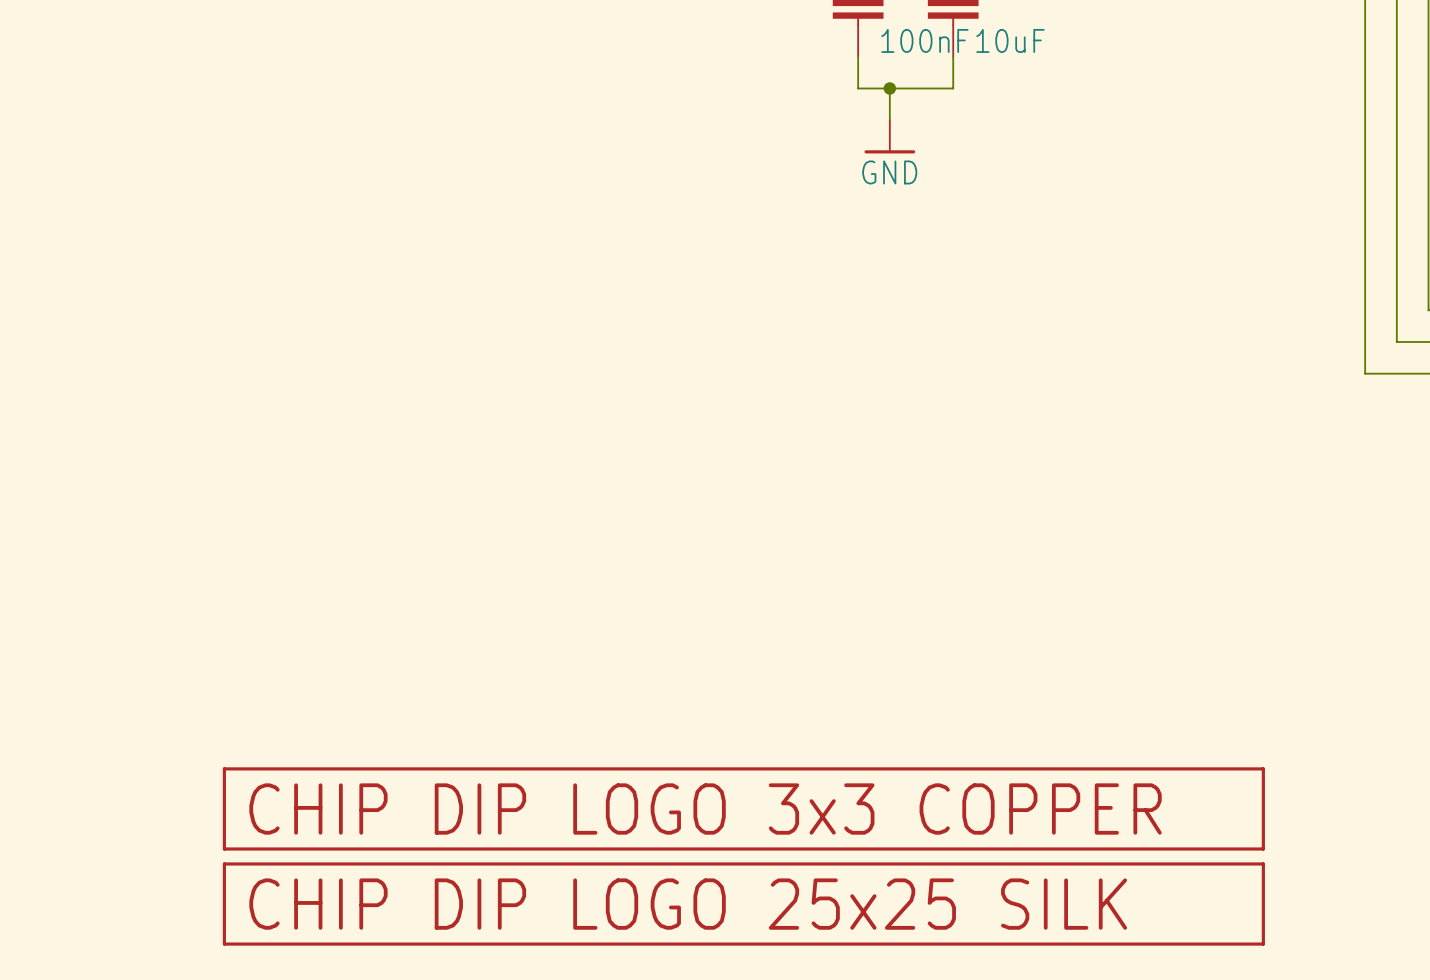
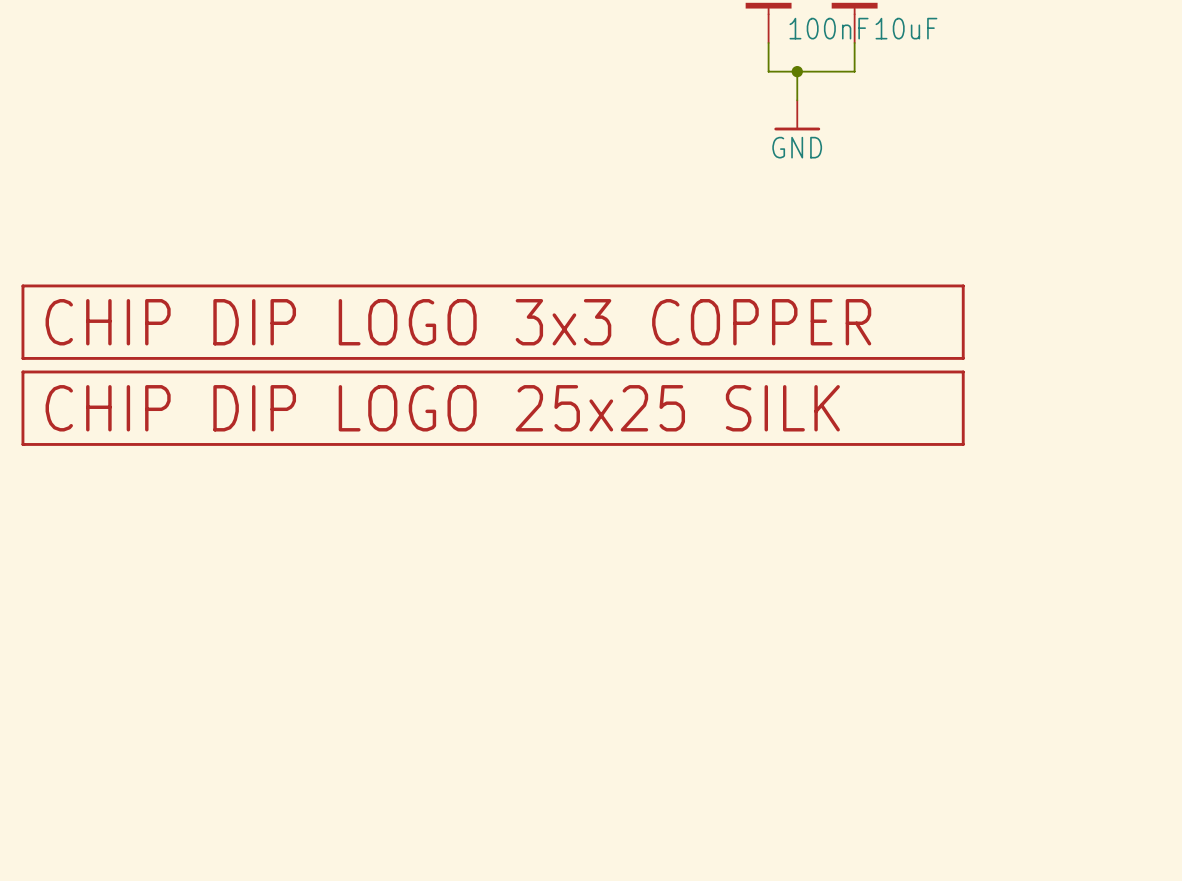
part: none -> (493, 322)
part: none -> (493, 408)
part: (743, 808) -> none
part: (743, 904) -> none

